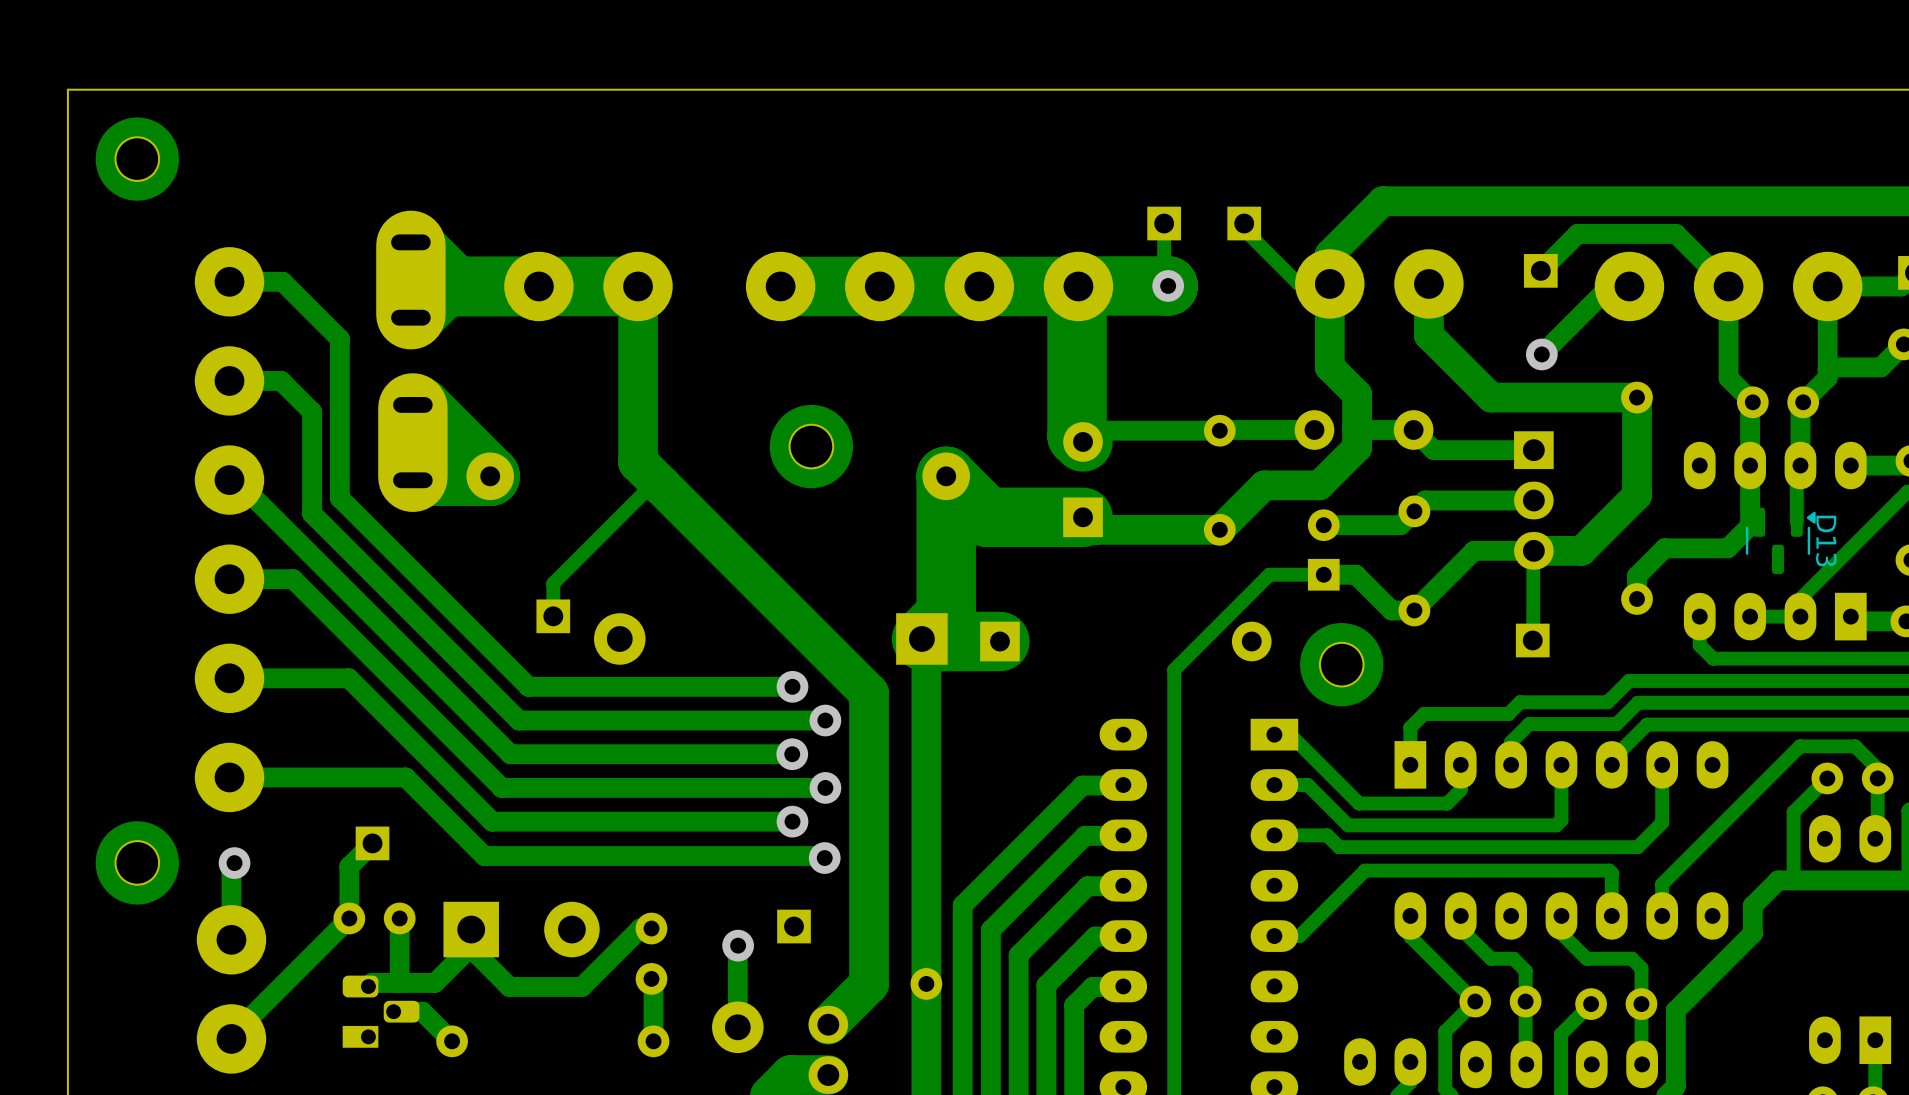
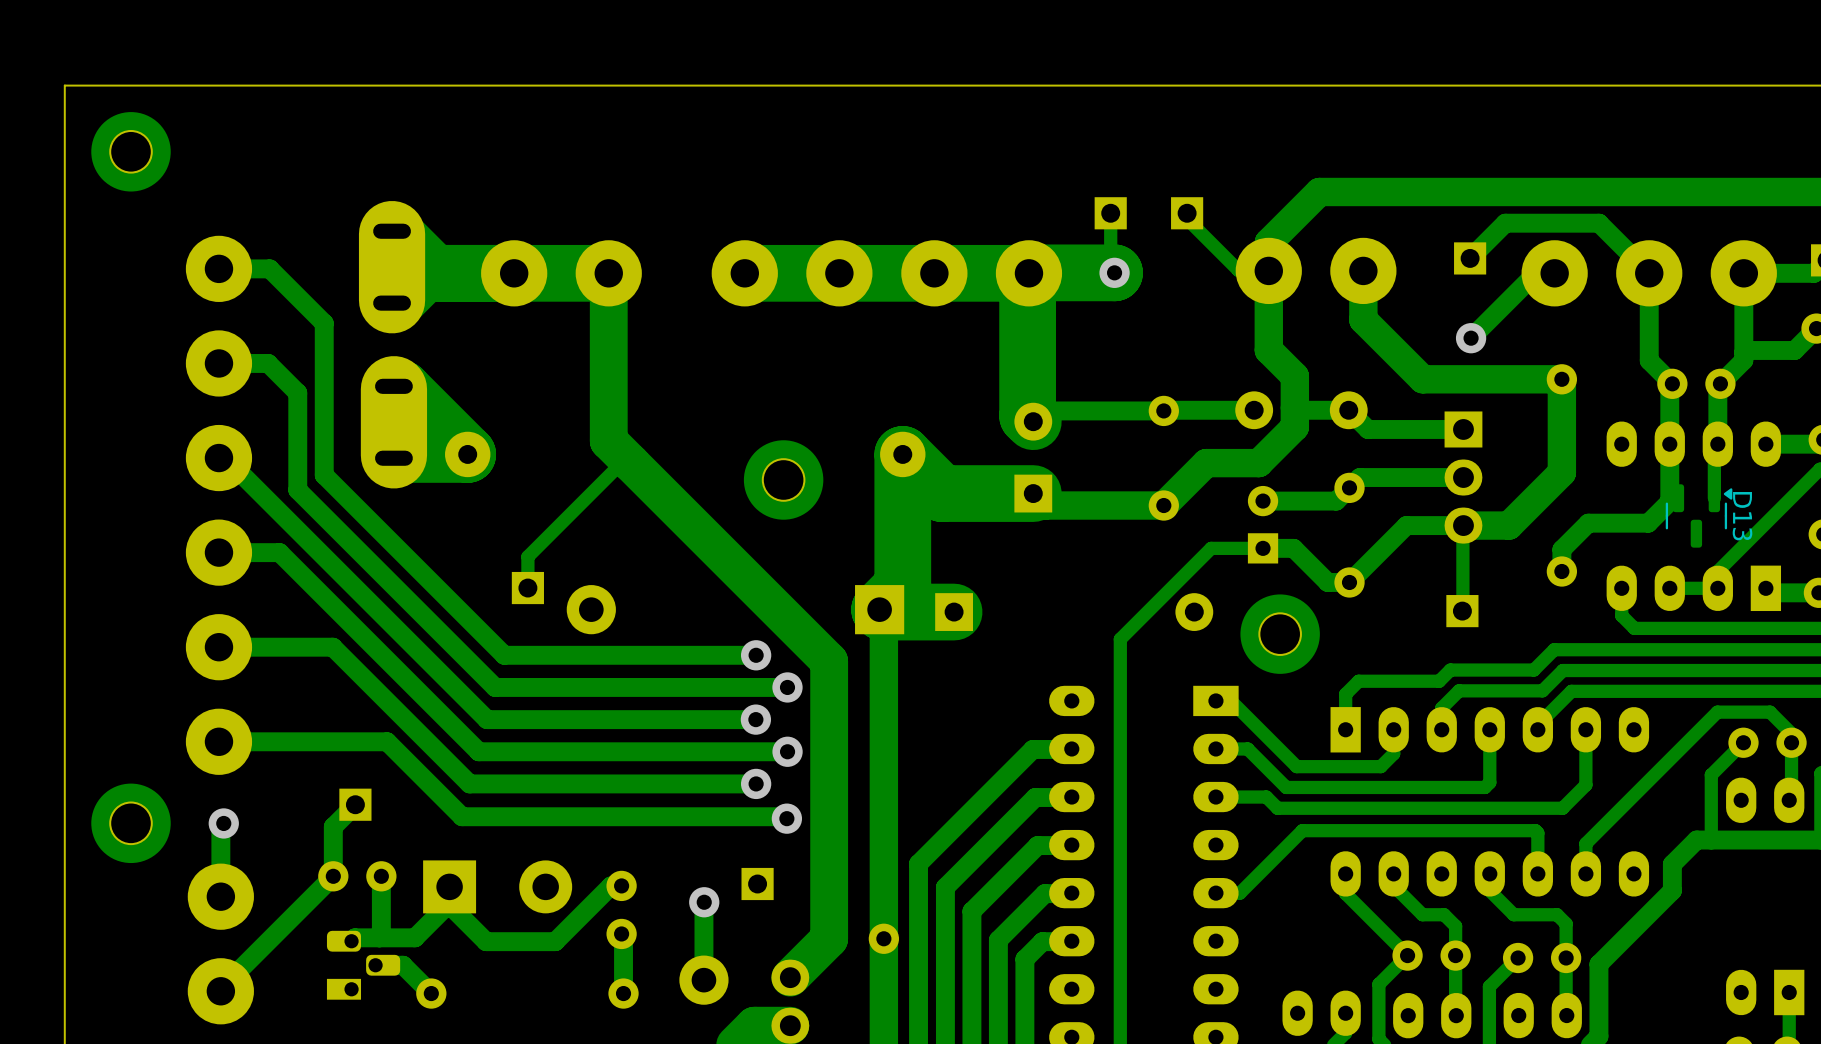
part position: (811, 446) -> (783, 479)

